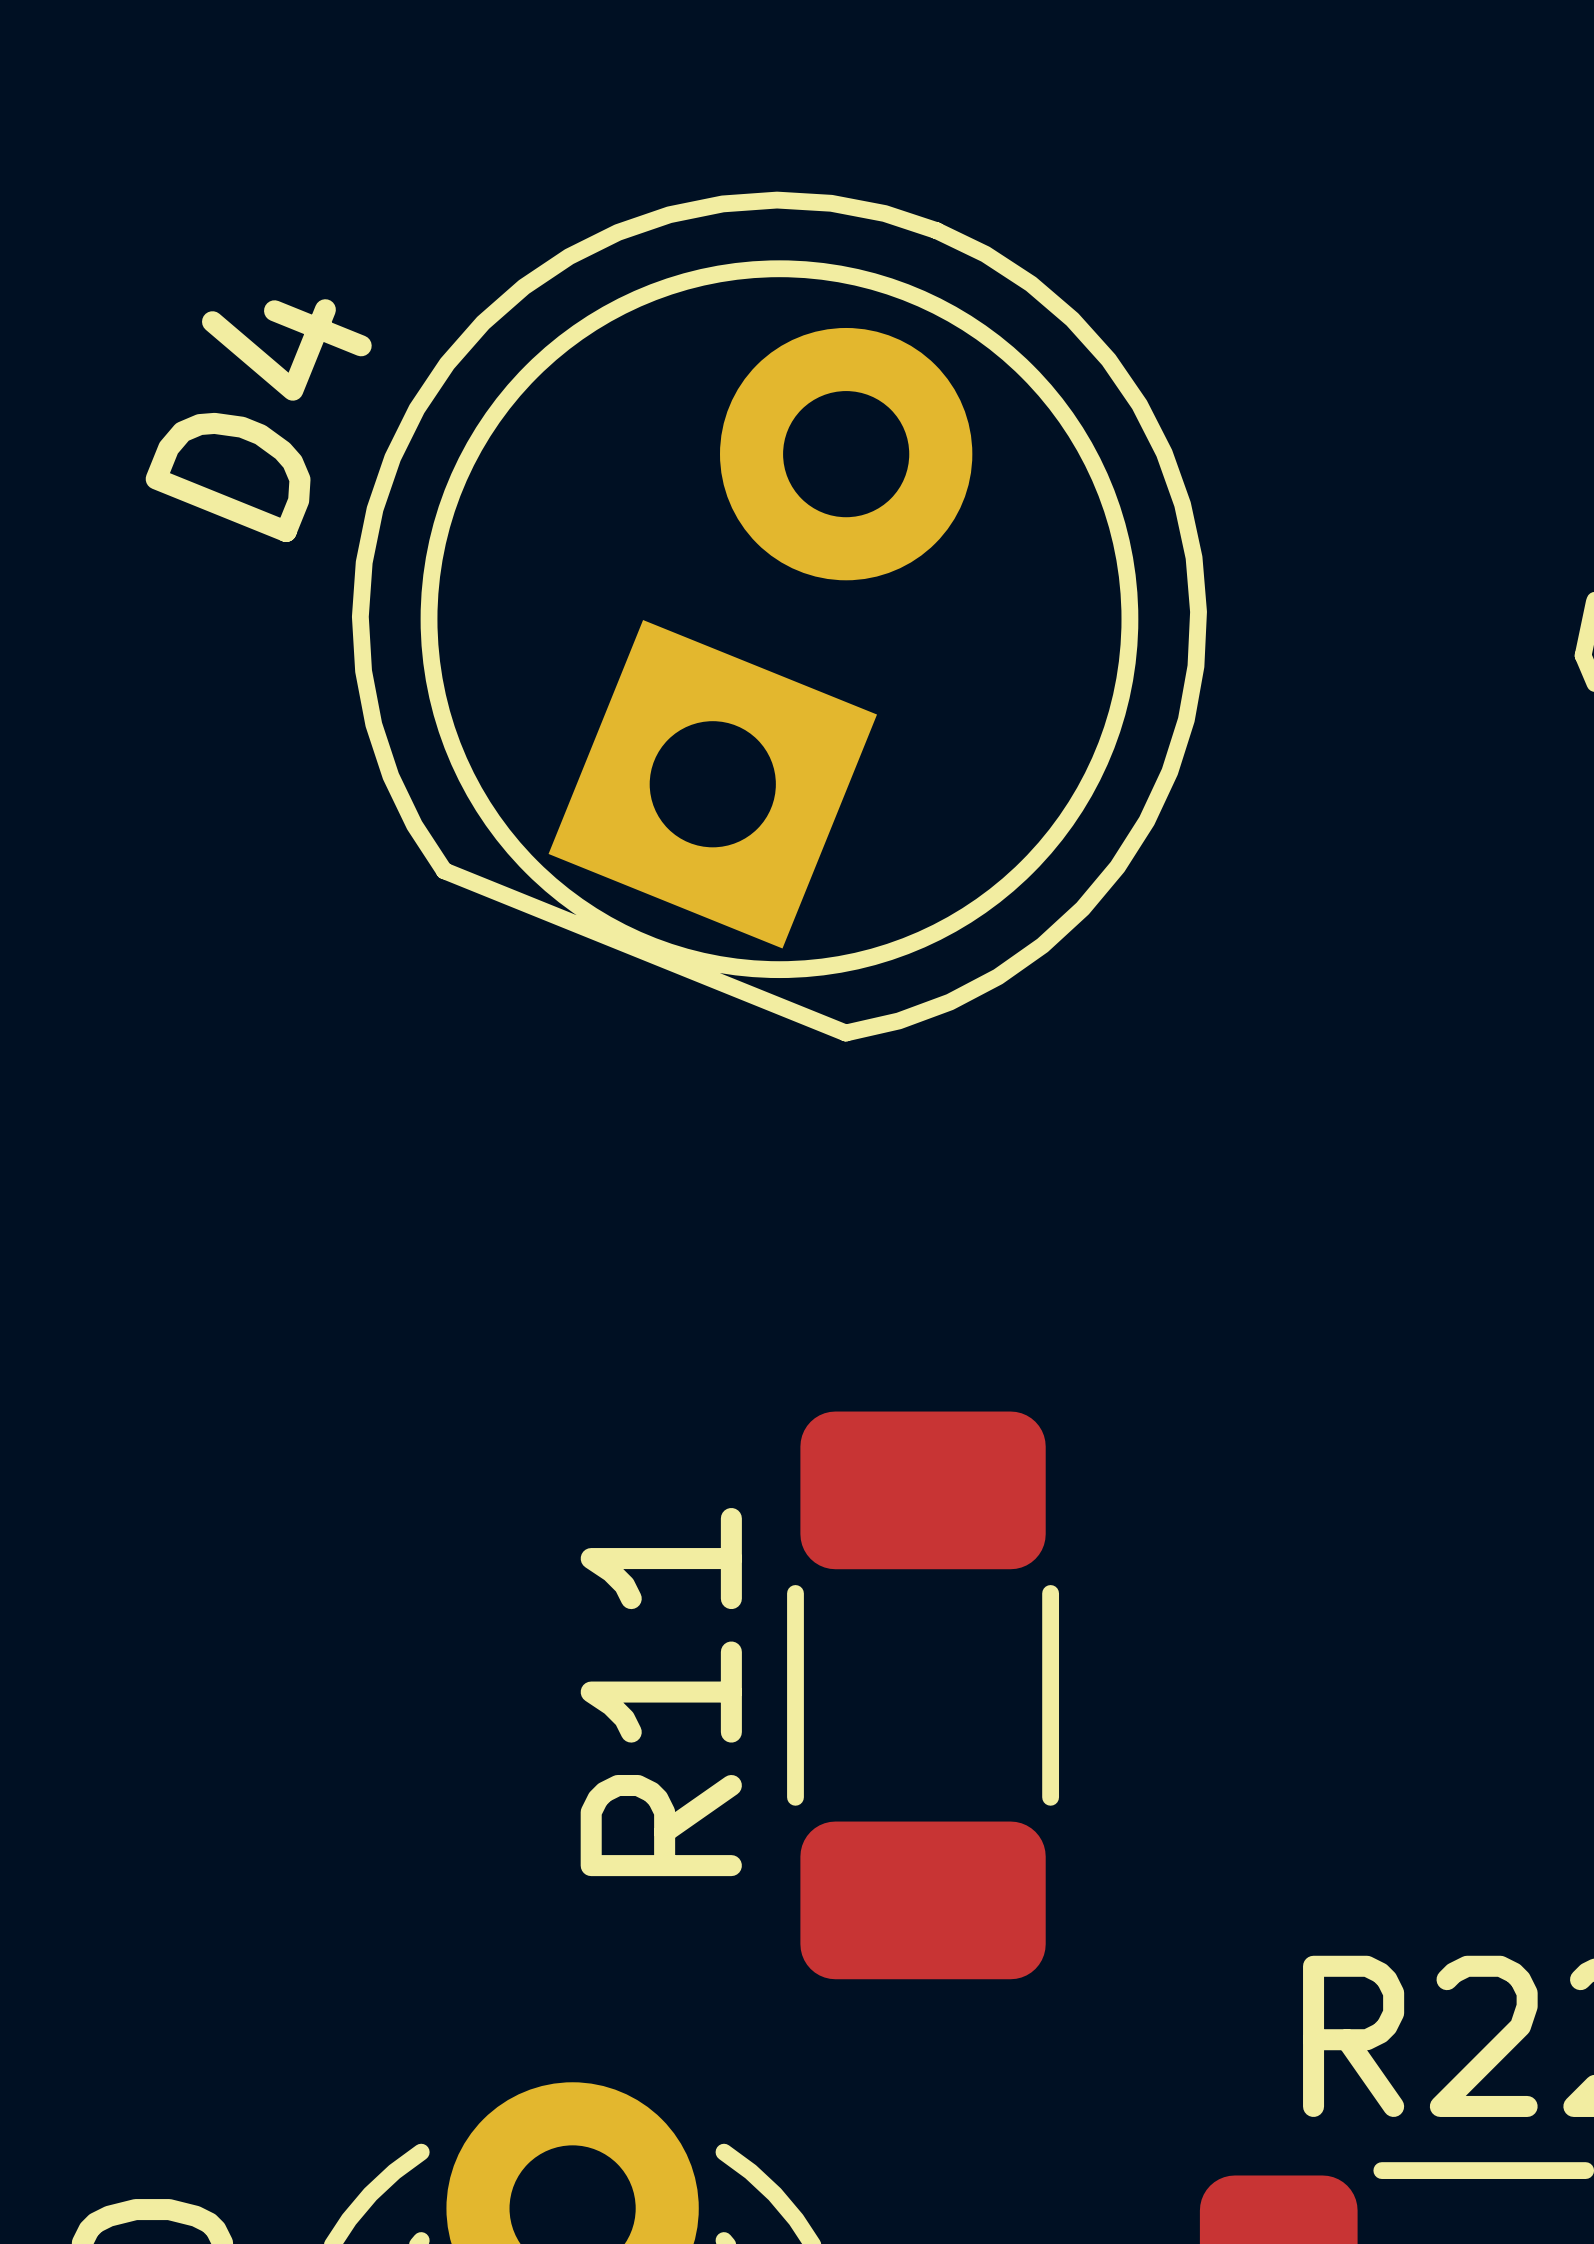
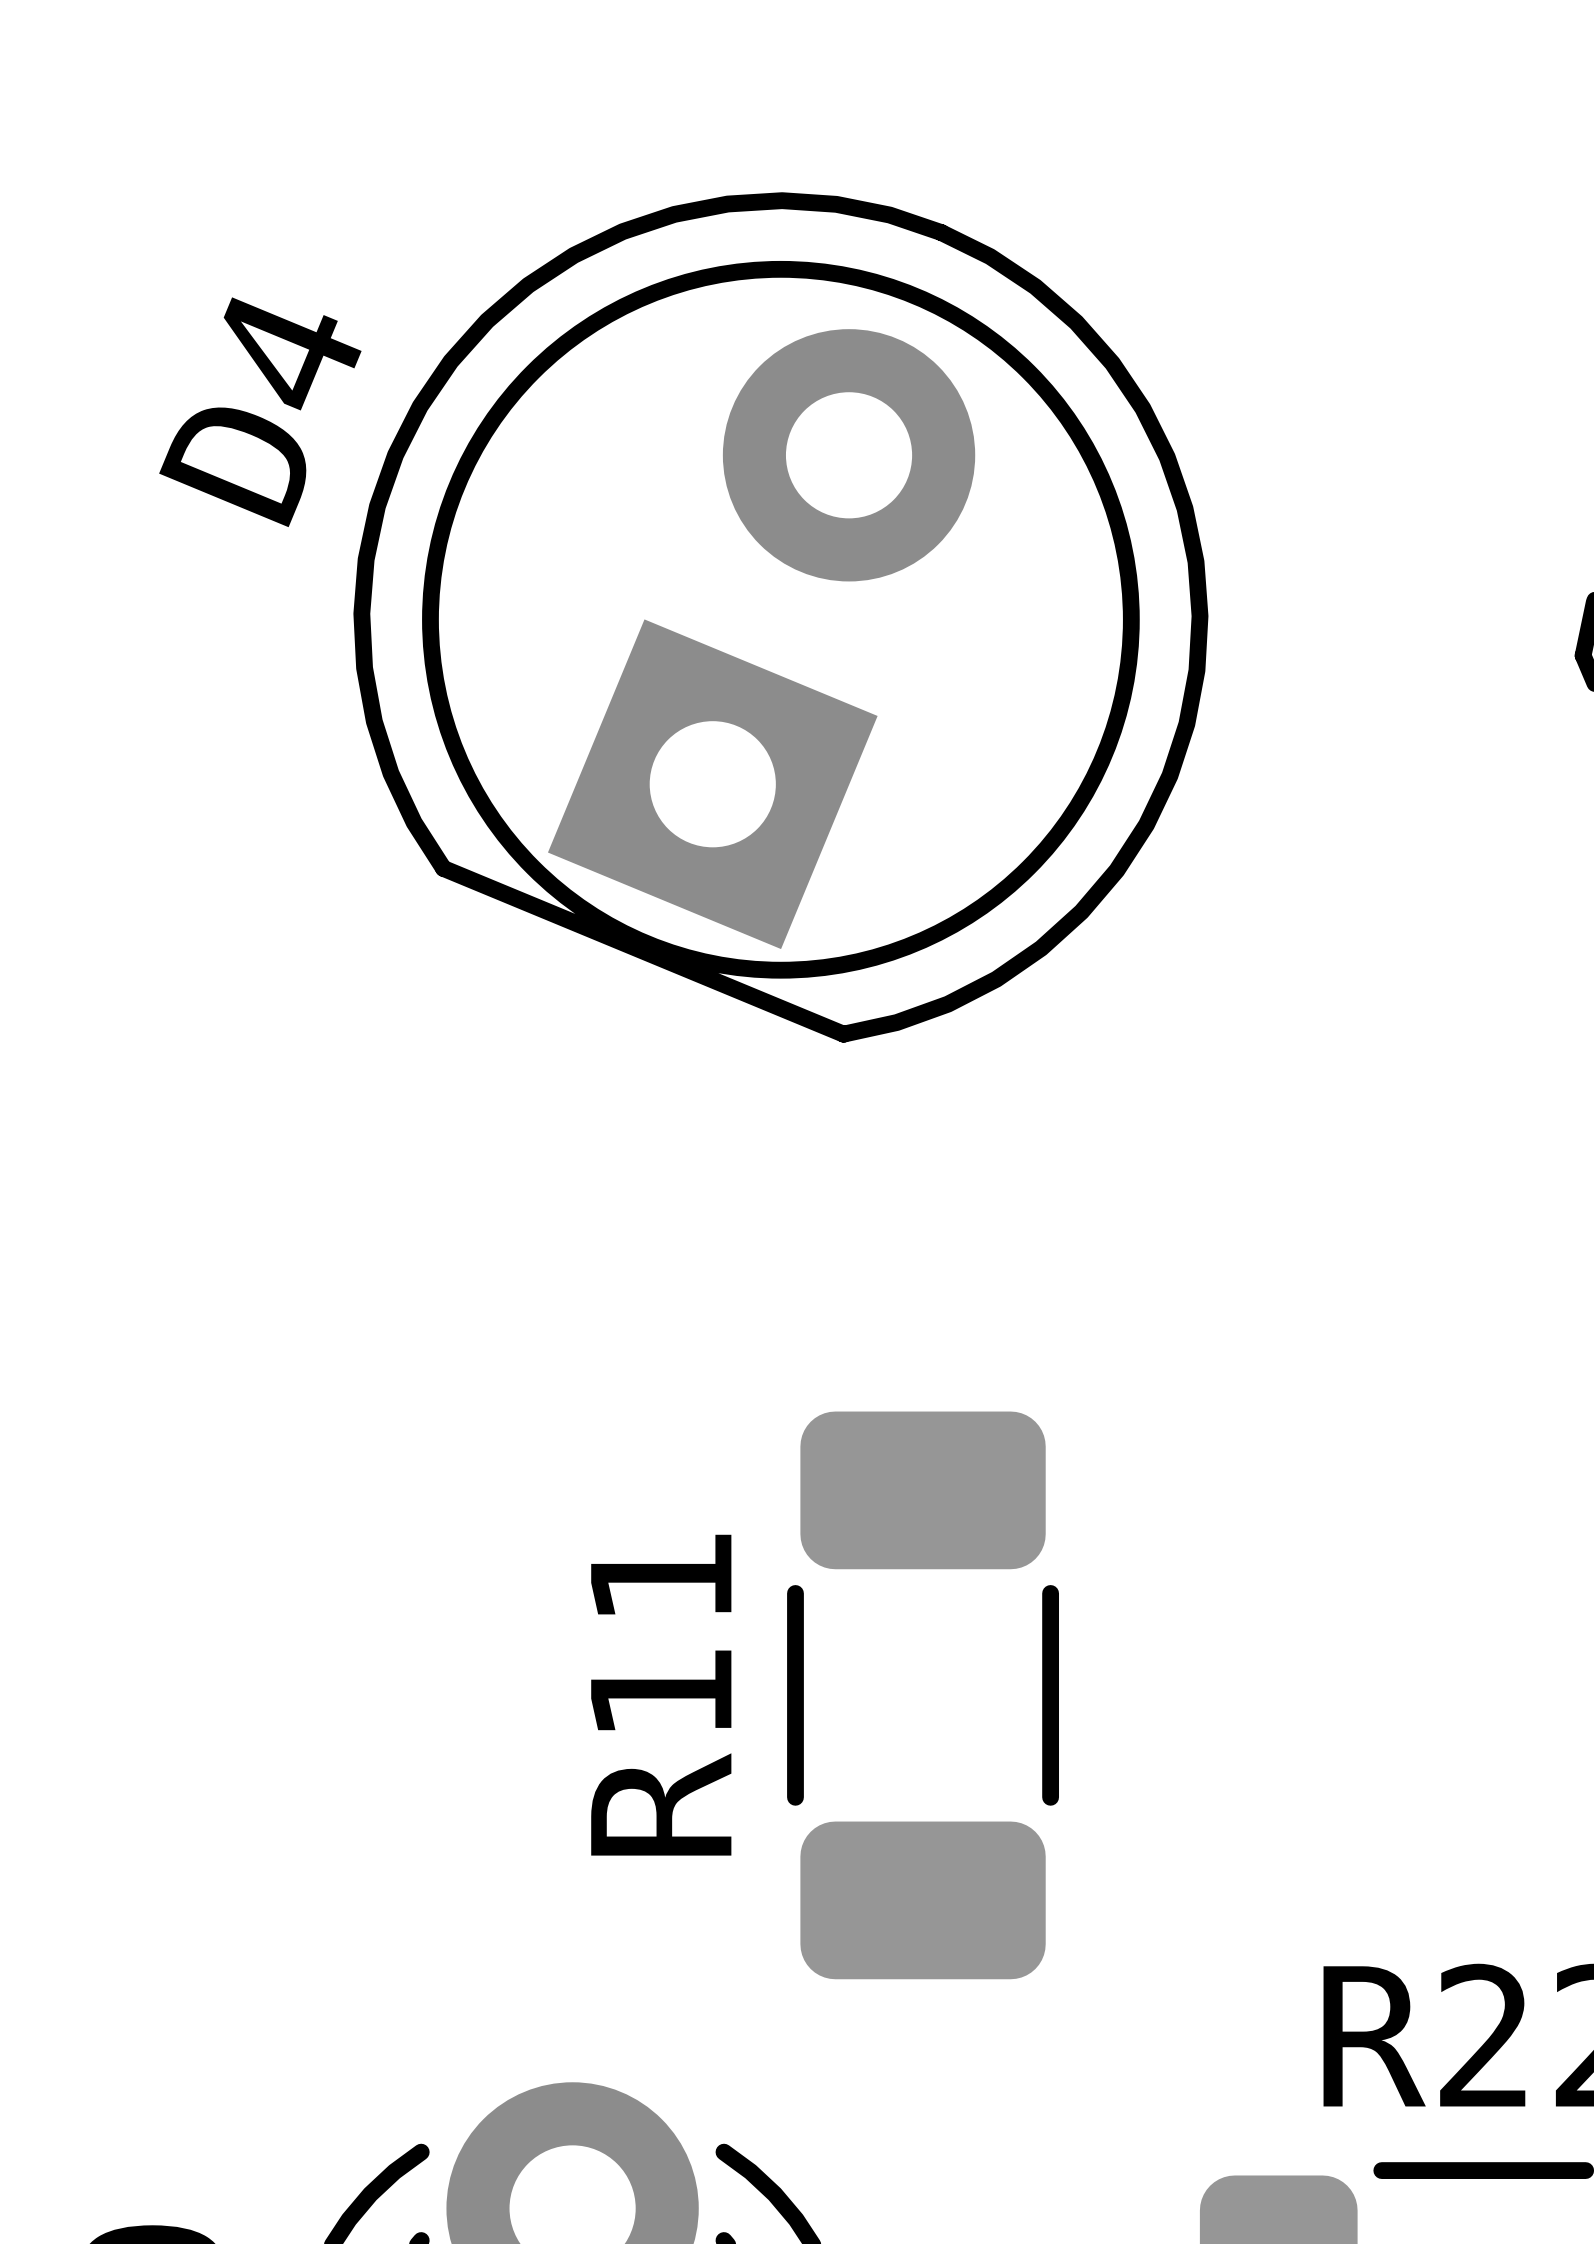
D4 rotation: 0° (779, 616) -> 0.5° clockwise (780, 617)

